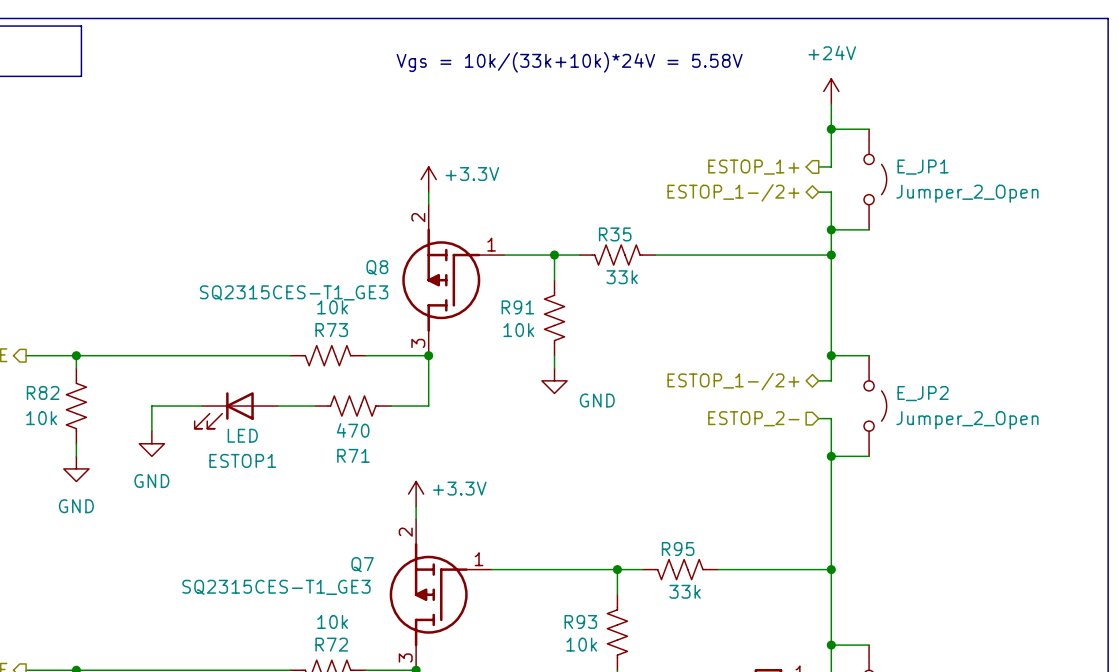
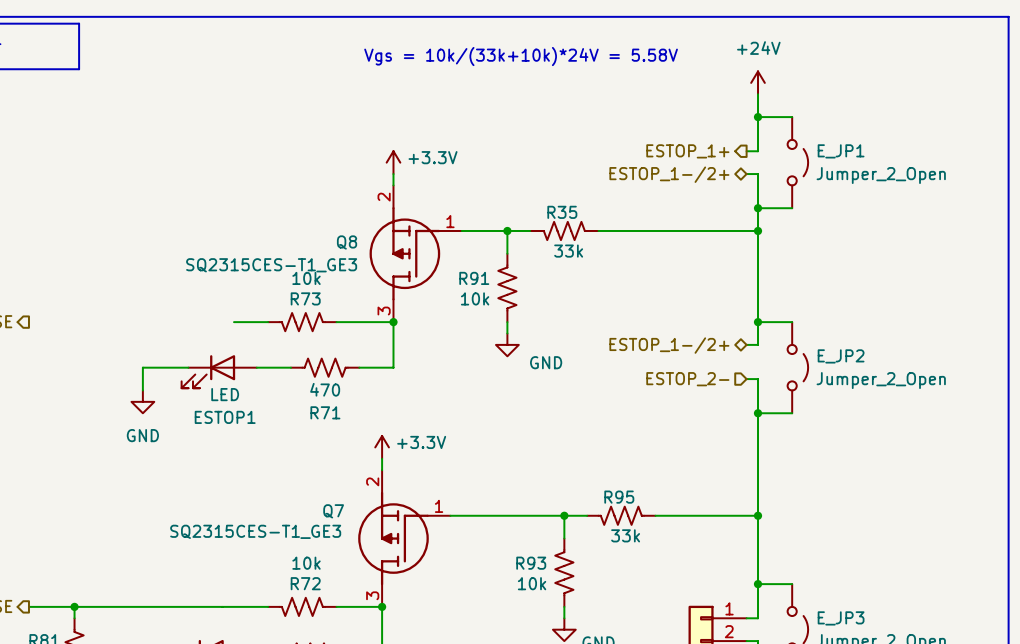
wire: (26, 355) (252, 355) -> none
wire: (76, 355) (76, 368) -> none
junction: (76, 355) -> none
R82: 10k (76, 406) -> none
wire: (76, 443) (76, 456) -> none
power symbol: GND (76, 468) -> none

